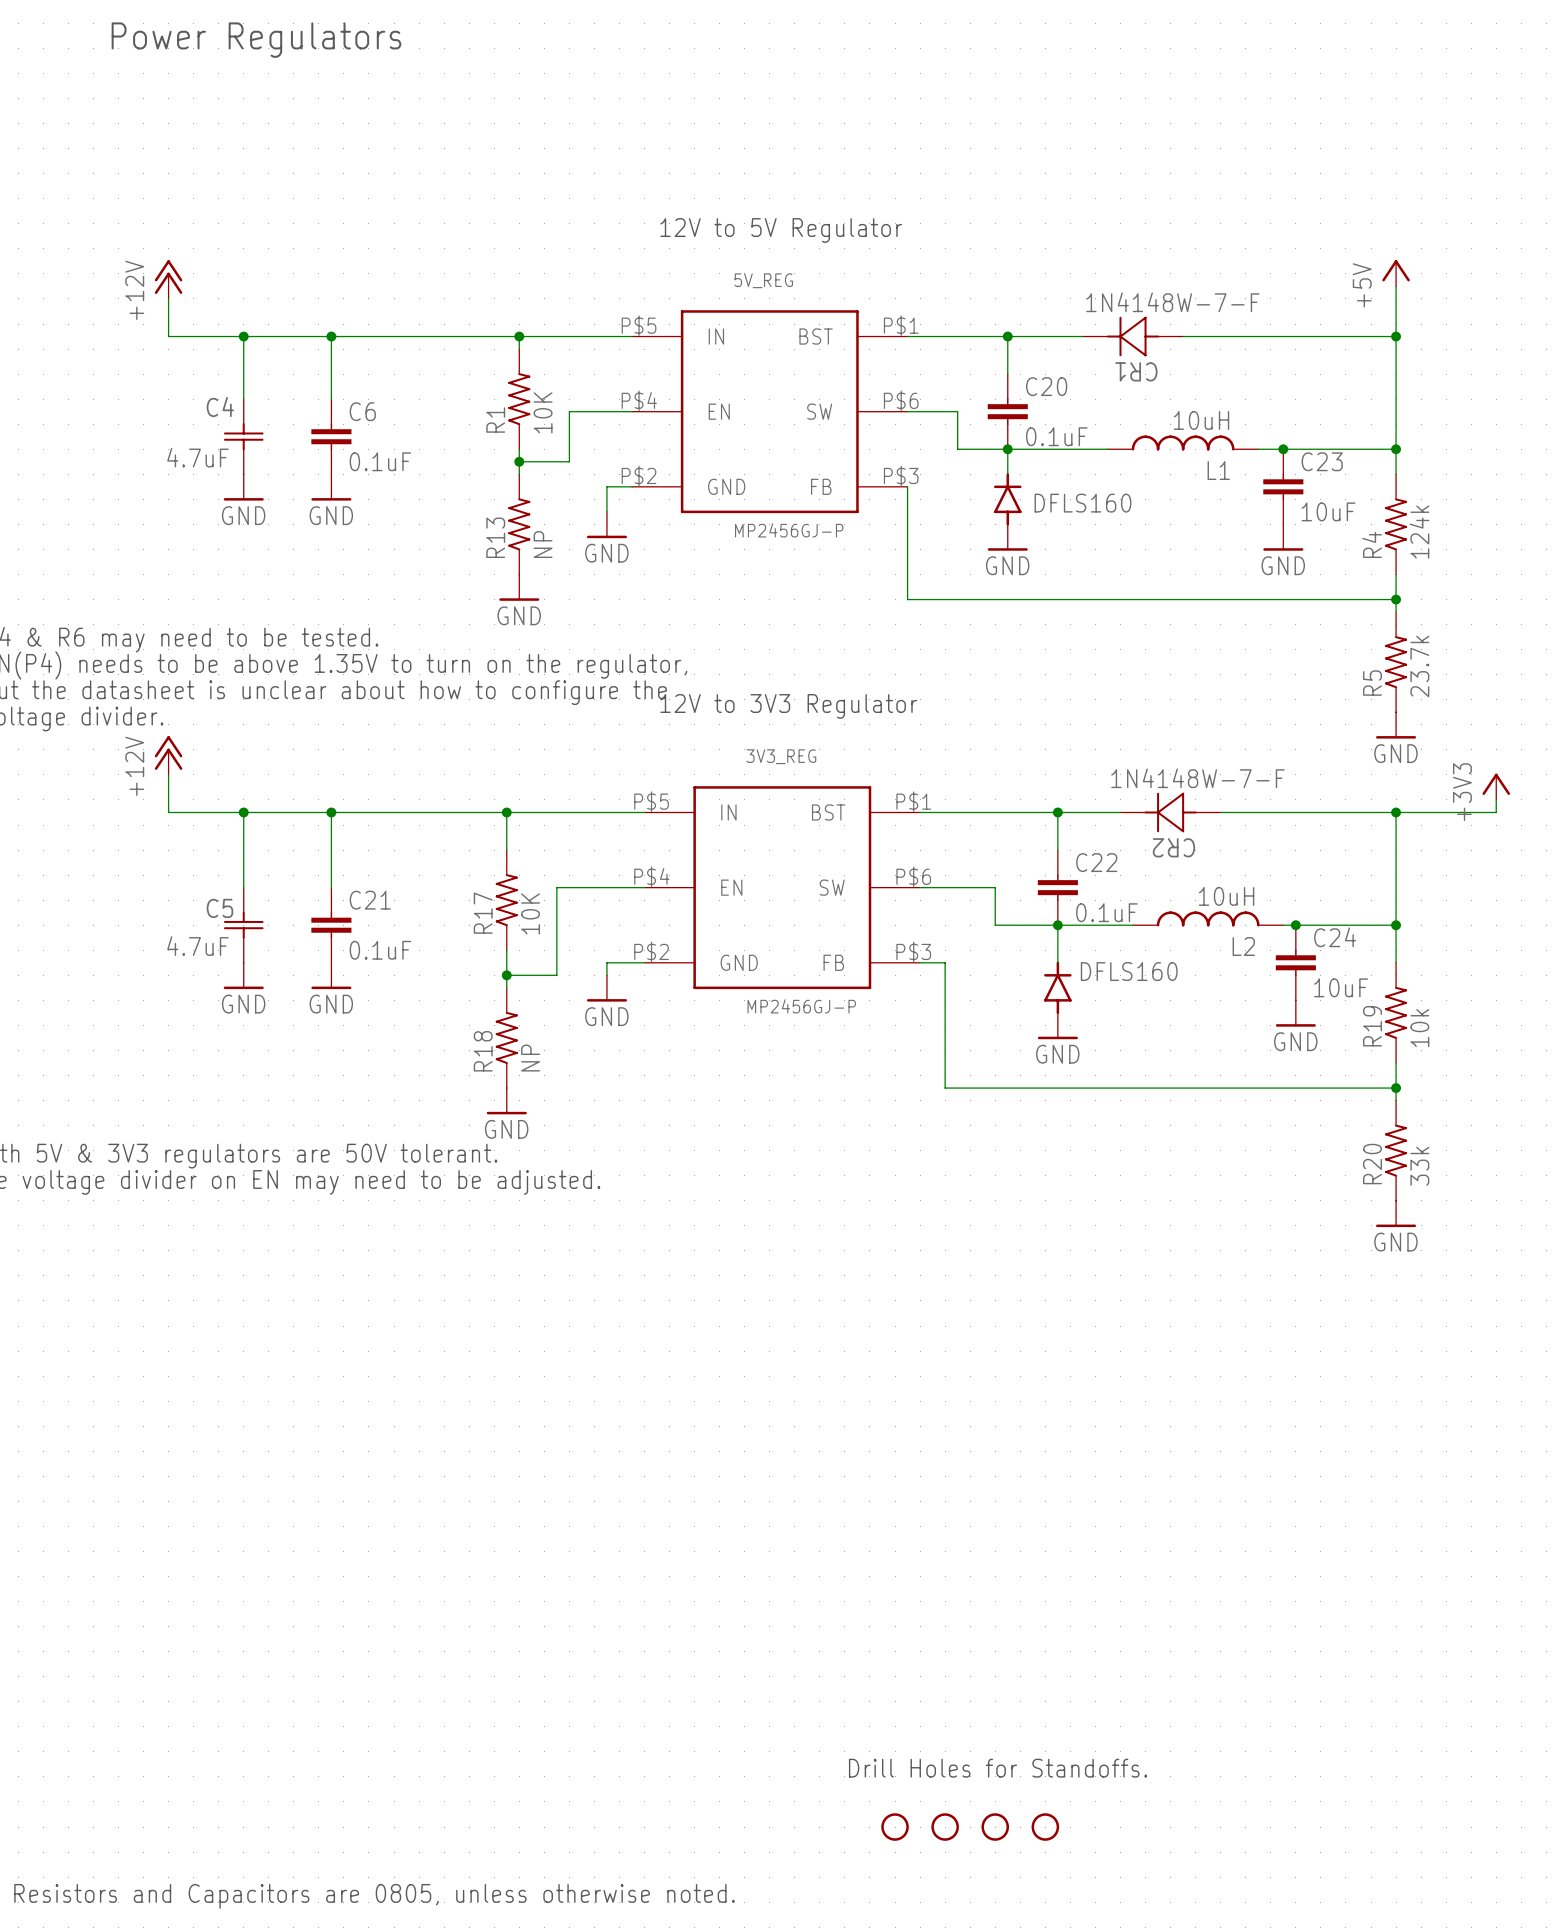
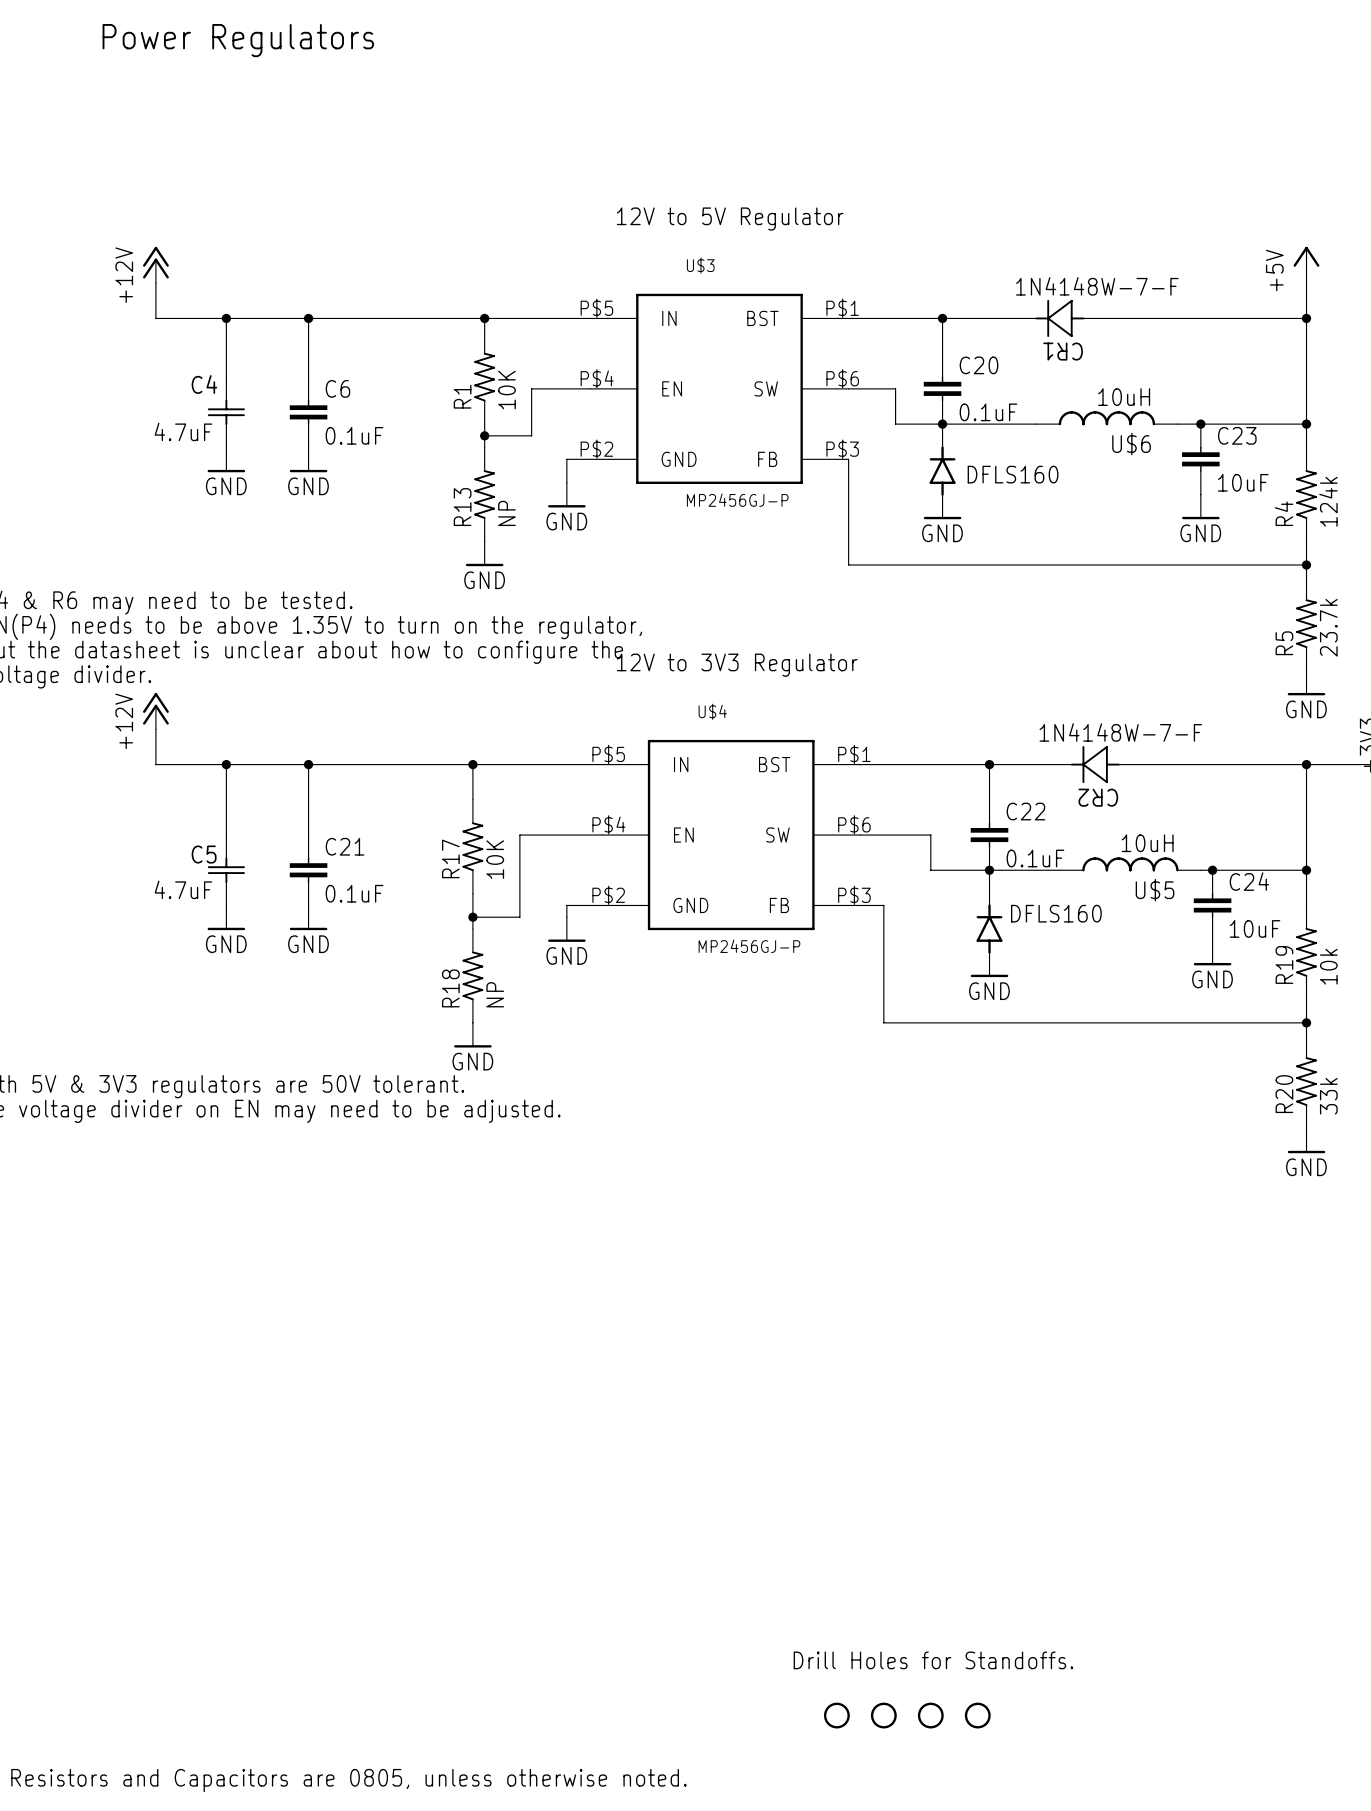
5V_REG name: 5V_REG (763, 280) -> U$3 (700, 265)
L1 name: L1 (1218, 470) -> U$6 (1131, 444)
3V3_REG name: 3V3_REG (781, 756) -> U$4 (712, 711)
L2 name: L2 (1243, 946) -> U$5 (1155, 890)

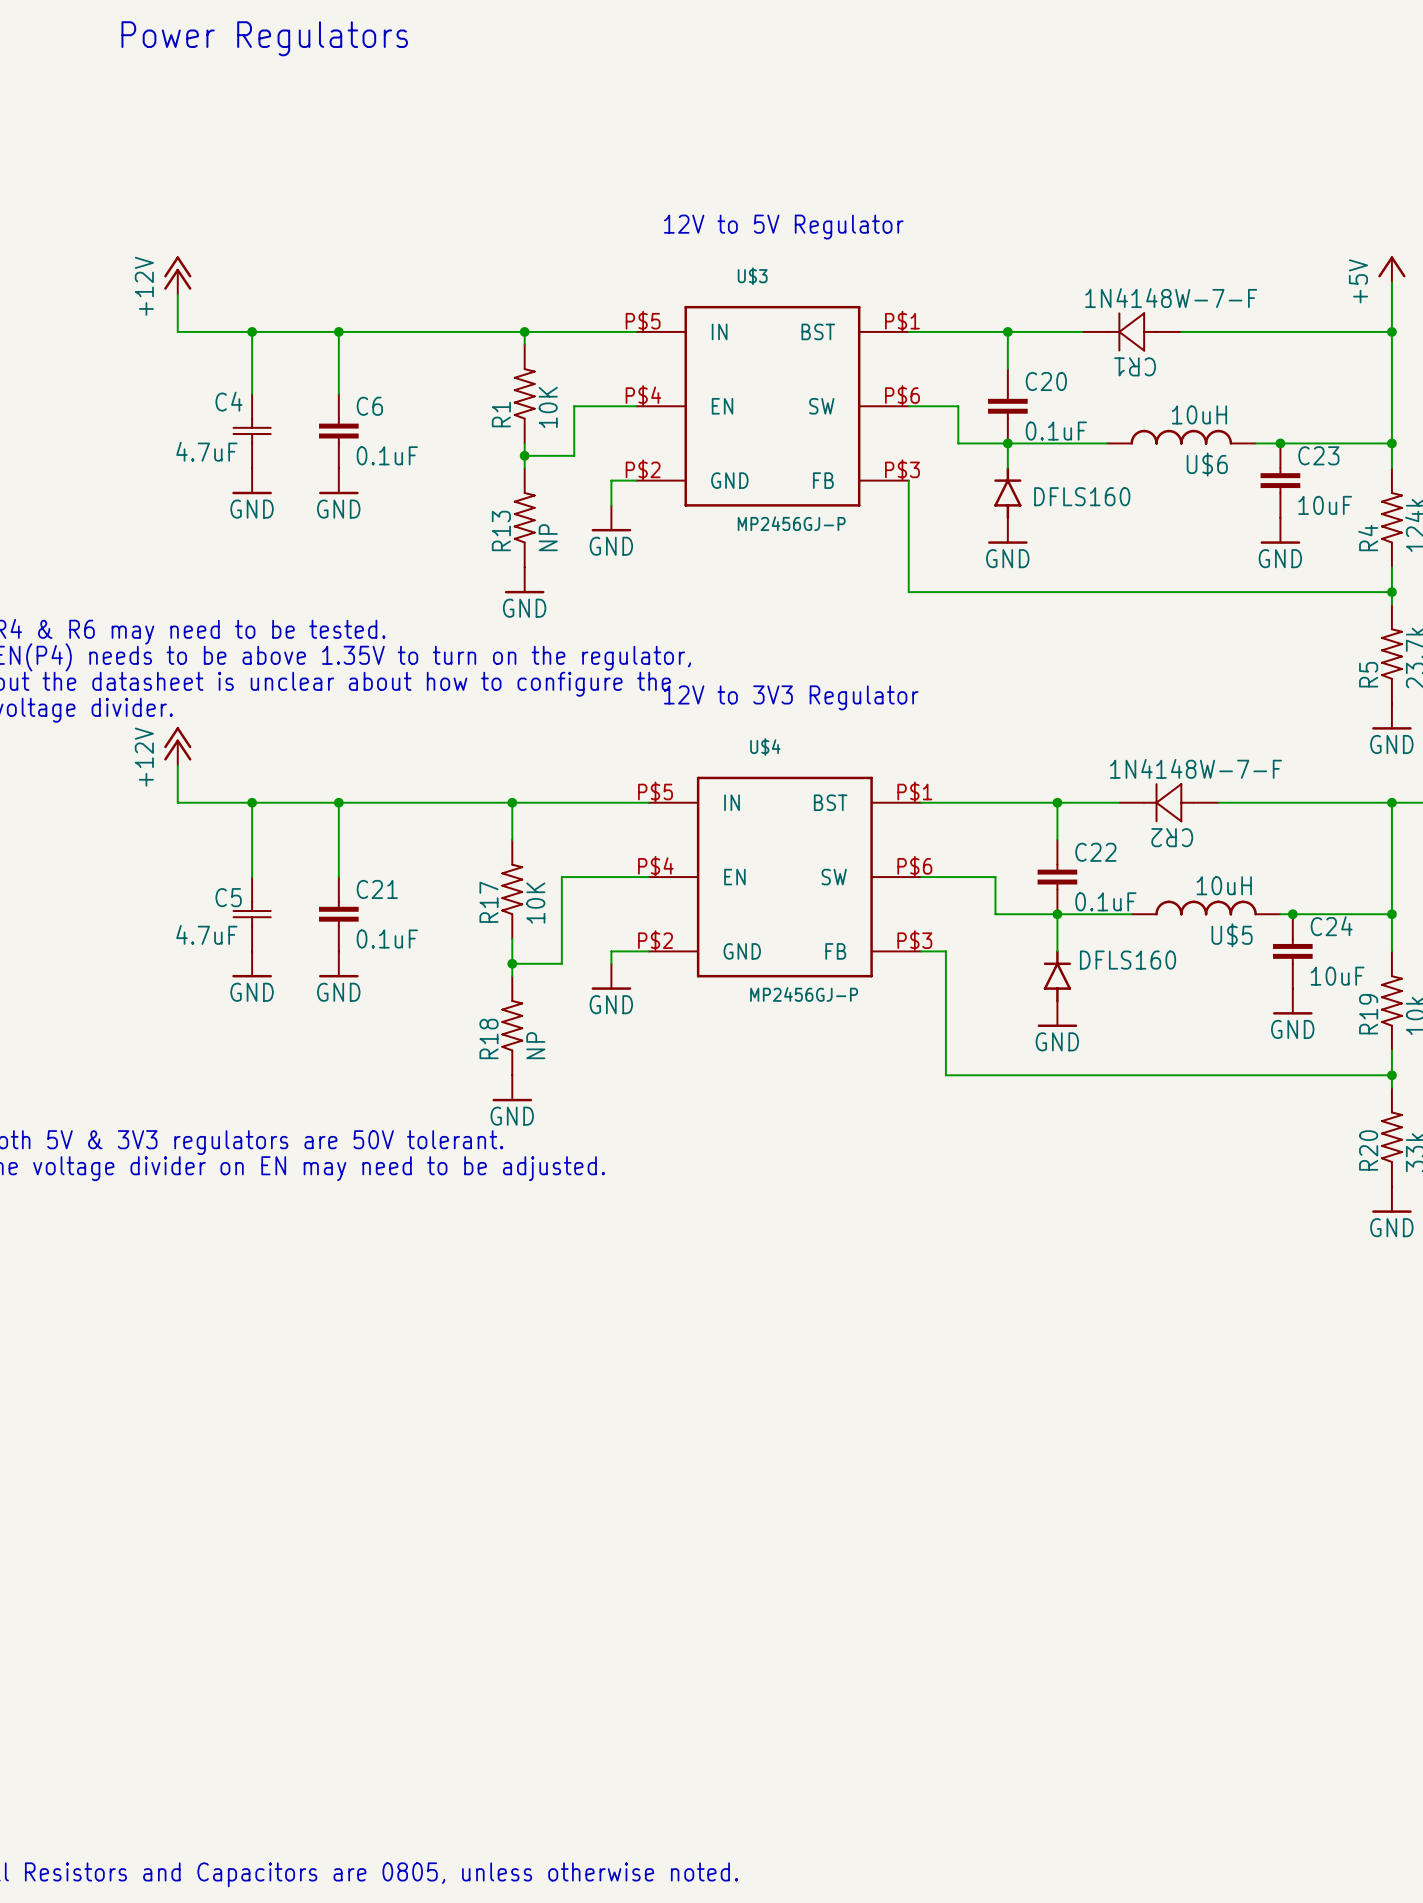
text: Drill Holes for Standoffs. (933, 1660) -> none
part: (836, 1715) -> none
part: (883, 1715) -> none
part: (930, 1715) -> none
part: (977, 1715) -> none

